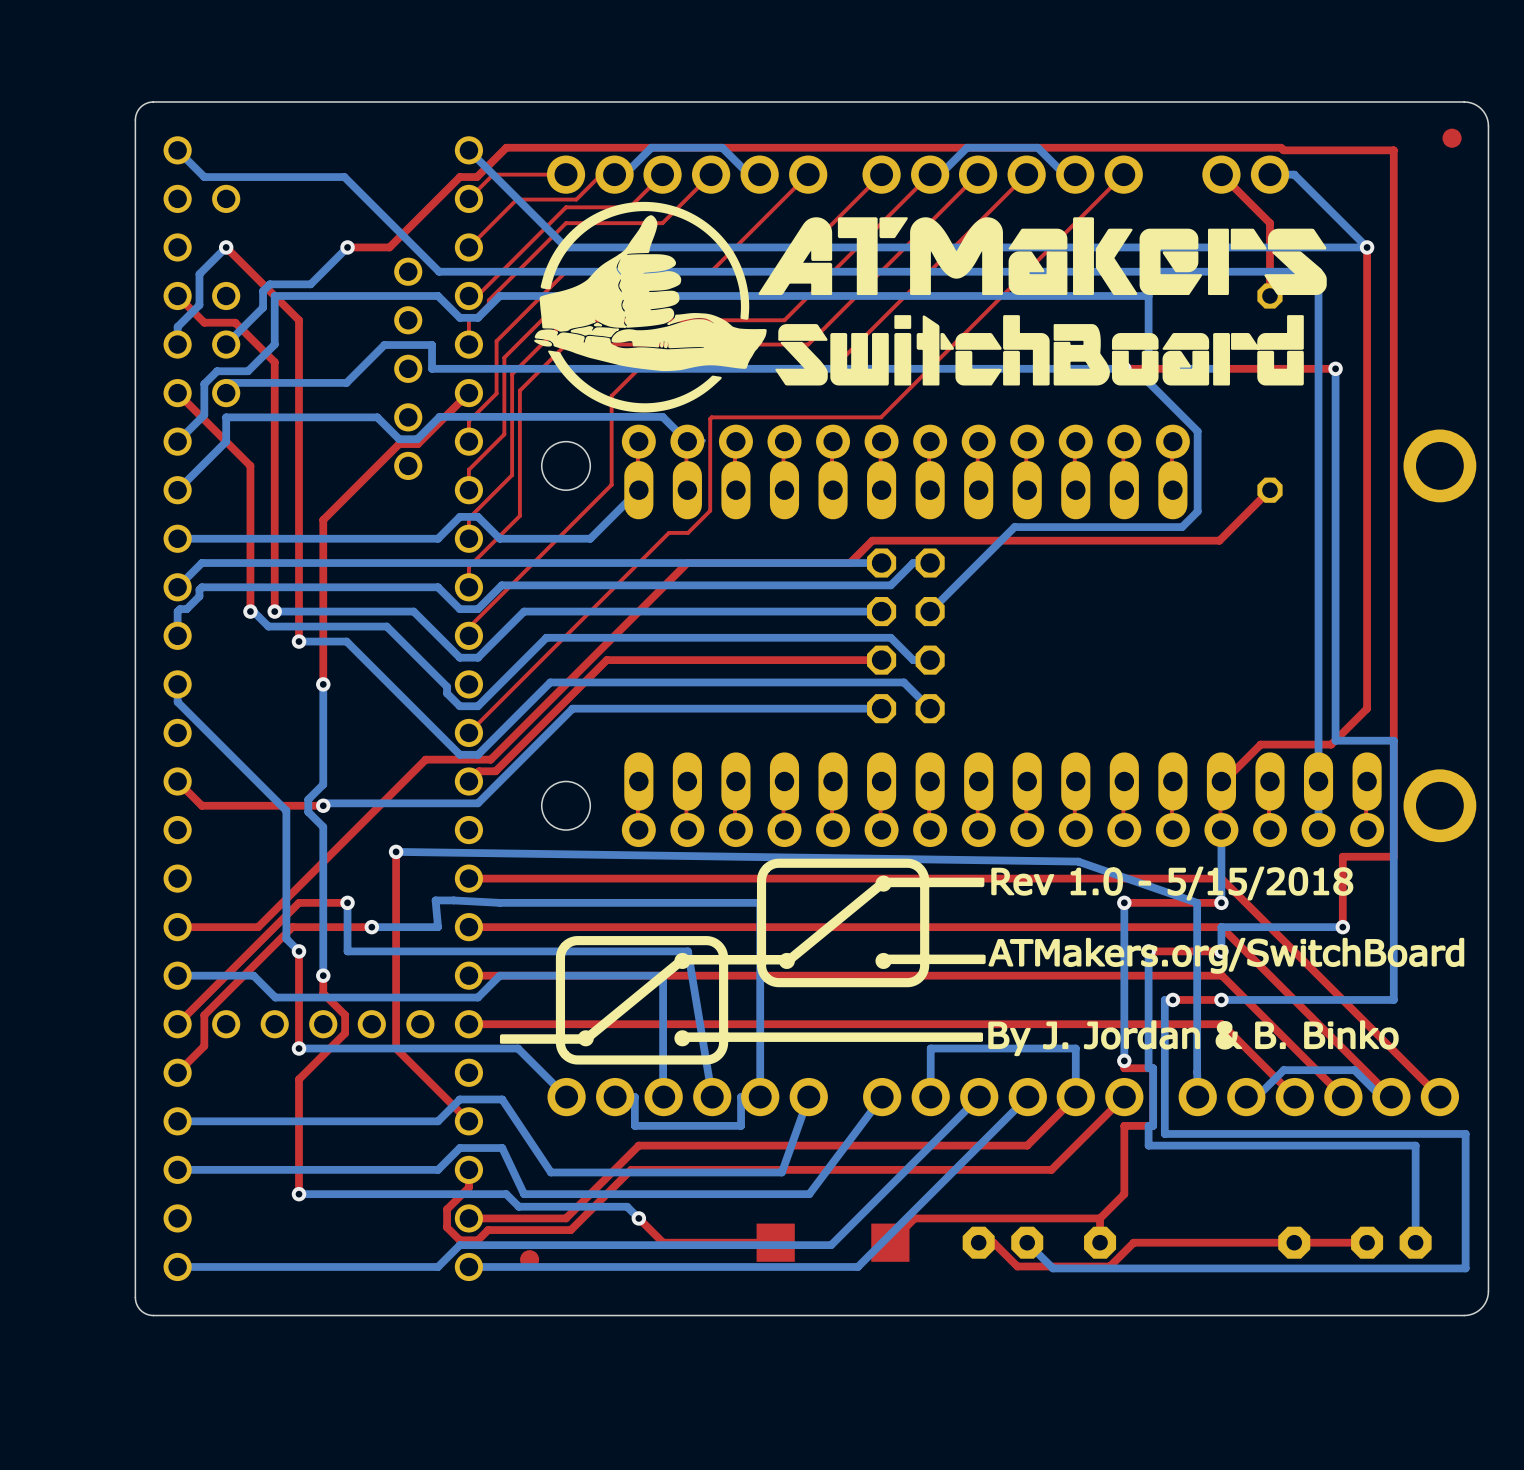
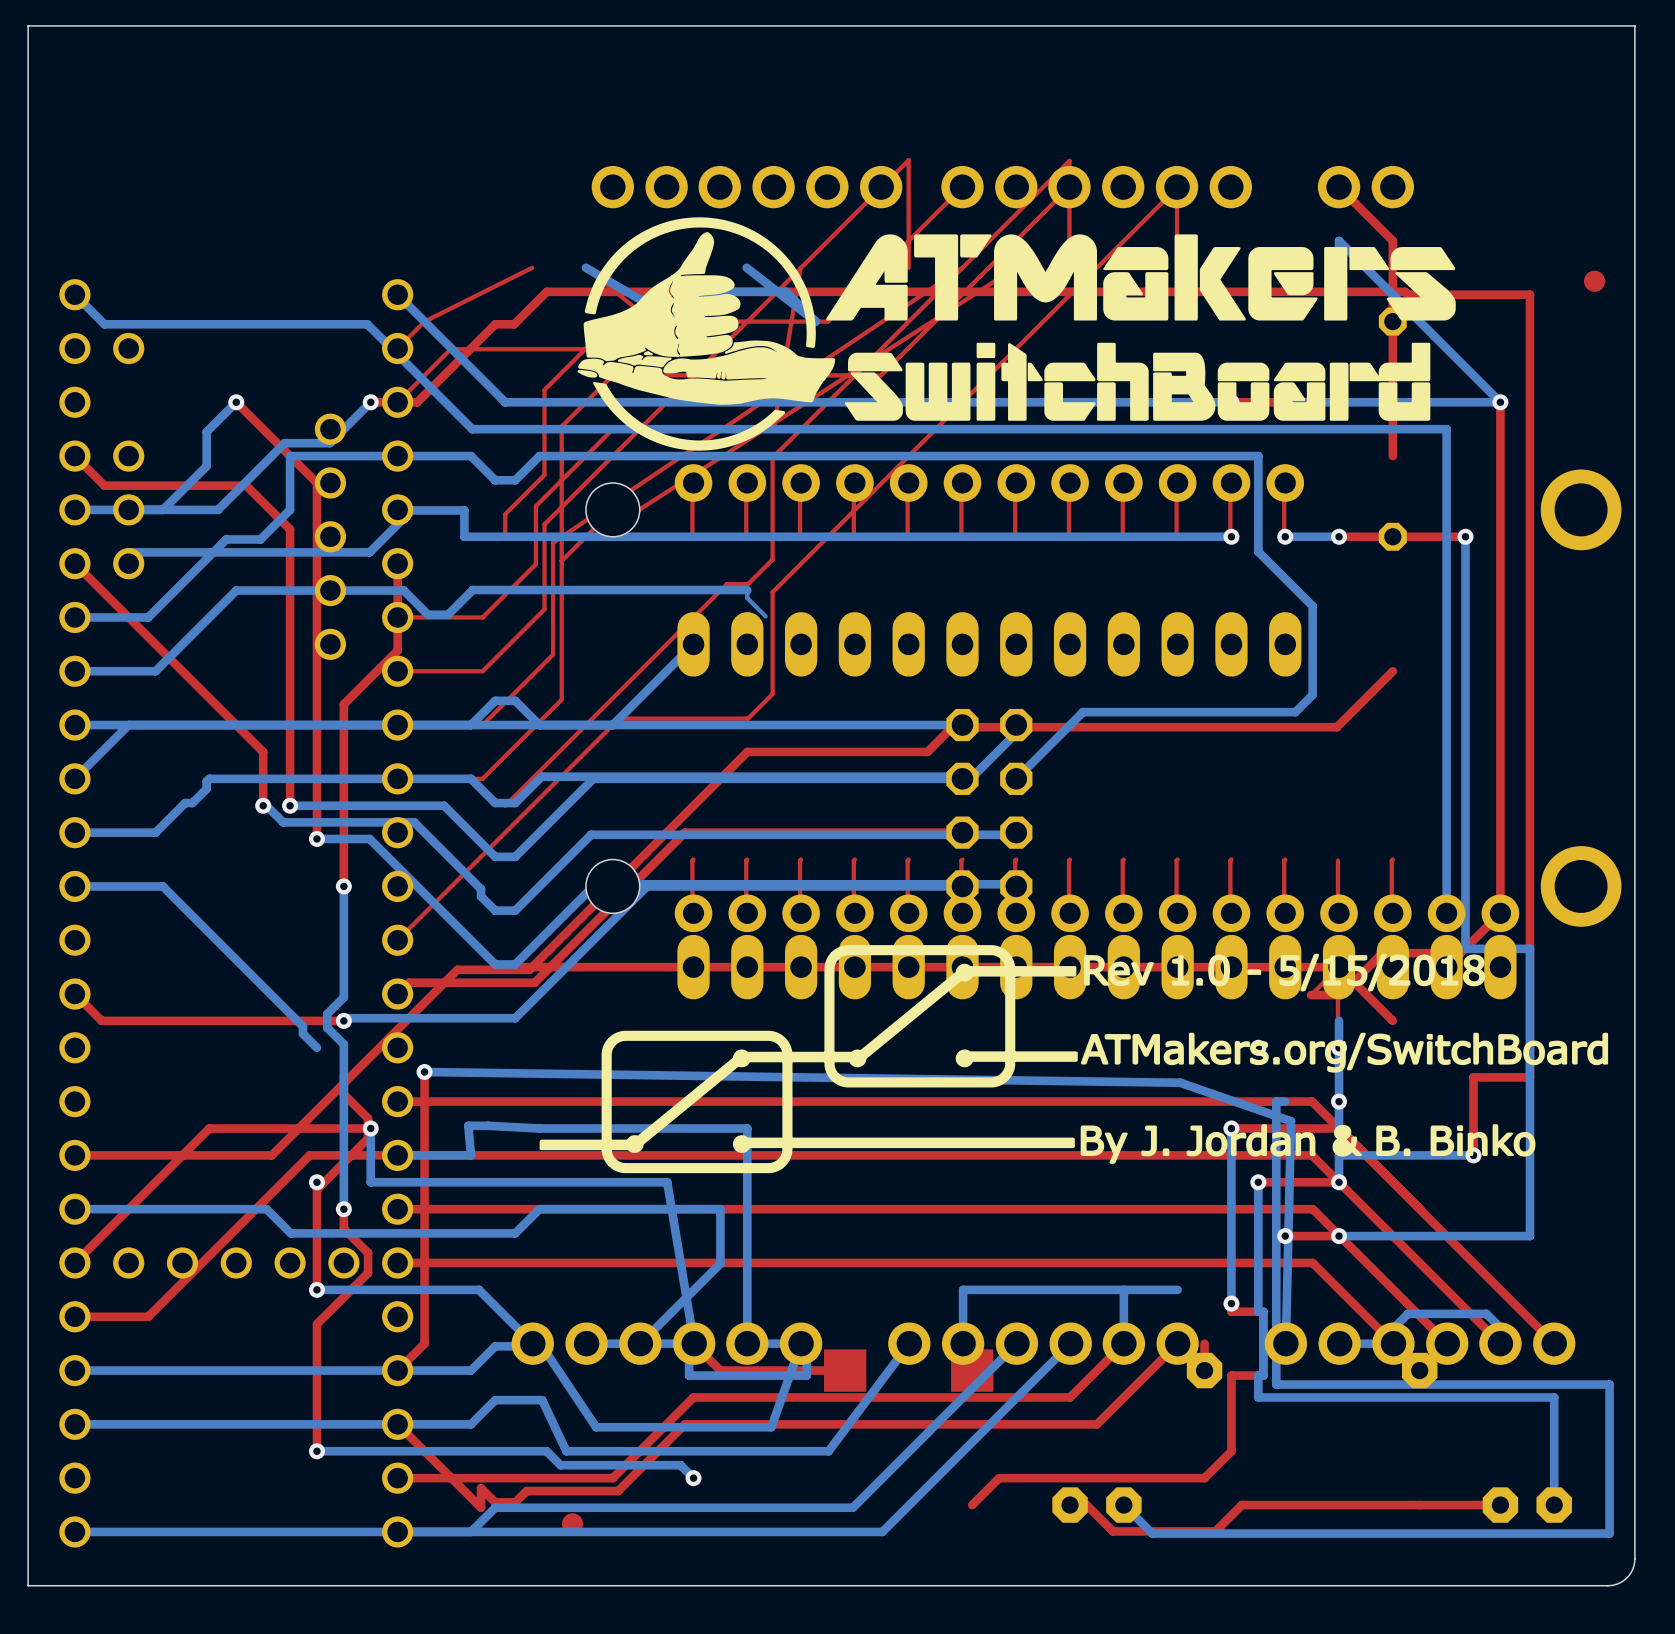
board edge: (1488, 126) (1486, 116) (1481, 109) (1473, 103) (1464, 101) (153, 101) (142, 105) (137, 110) (135, 119) (135, 1297) (140, 1310) (153, 1315) (1464, 1315) (1473, 1313) (1481, 1308) (1486, 1300) (1488, 1291) -> (1634, 133) (1634, 25) (28, 25) (28, 1585) (1611, 1585) (1627, 1577) (1634, 1562) (1634, 1424)
part position: (1452, 138) -> (1594, 281)
bottom track: (177, 150) (204, 177) (344, 177) (439, 271) (1318, 271) (1318, 393) -> (74, 294) (104, 324) (367, 324) (472, 429) (1446, 429)
bottom track: (468, 150) (566, 247) (1367, 247) (1294, 174) (1269, 174) -> none
top track: (566, 174) (493, 174) (468, 198) -> none
top track: (614, 174) (601, 174) (576, 199) (516, 199) (468, 247) -> none
top track: (662, 174) (629, 207) (566, 207) (477, 295) (468, 295) -> none
top track: (711, 174) (662, 223) (566, 223) (488, 300) (488, 304) (477, 315) (473, 315) (468, 320) (468, 344) -> none
bottom track: (759, 174) (749, 174) (722, 147) (651, 147) (624, 174) (614, 174) -> none
top track: (808, 174) (711, 271) (566, 271) (496, 341) (496, 393) (468, 421) (468, 441) -> none
top track: (930, 174) (784, 320) (566, 320) (512, 374) (512, 475) (468, 518) (468, 538) -> none
top track: (1026, 174) (832, 368) (638, 368) (611, 396) (611, 484) (468, 627) (468, 635) -> none
bottom track: (1075, 174) (1064, 174) (1037, 147) (966, 147) (940, 174) (930, 174) -> none
top track: (1123, 174) (881, 417) (711, 417) -> (1069, 267) (1069, 160) (774, 456)
bottom track: (226, 247) (199, 274) (199, 305) (177, 326) (177, 344) -> none
top track: (226, 247) (299, 320) (299, 441) -> (236, 402) (316, 482)
via: (226, 247) -> none
bottom track: (347, 247) (310, 284) (269, 284) (263, 291) (263, 307) (226, 344) -> none
top track: (347, 247) (389, 247) (459, 177) (477, 177) (506, 147) (1281, 147) (1283, 150) (1393, 150) (1393, 271) -> (370, 402) (417, 402) (495, 324) (514, 324) (546, 291) (1405, 291) (1408, 294) (1530, 294)
via: (347, 247) -> none
top track: none -> (532, 267) (424, 321) (397, 348)
top track: none -> (585, 267) (651, 321) (624, 349) (450, 349) (397, 402)
bottom track: none -> (746, 267) (815, 321) (785, 291) (707, 291) (677, 321) (585, 267)
top track: none -> (800, 267) (773, 429) (612, 429) (535, 506) (535, 564) (482, 617) (397, 617)
top track: none -> (908, 267) (908, 160) (544, 524) (544, 609) (482, 671) (397, 671)
top track: none -> (962, 267) (553, 542) (553, 654) (482, 725) (397, 725)
top track: none -> (1015, 267) (639, 509) (612, 509) (561, 560)
top track: none -> (1177, 267) (1177, 187) (772, 592) (772, 694) (748, 718) (619, 718) (397, 940)
bottom track: none -> (1339, 267) (1339, 240) (1500, 402) (1339, 402)
top track: (1367, 247) (1367, 368) -> (1392, 321) (1392, 456)
via: (1367, 247) -> none
top track: (177, 295) (204, 322) (235, 322) (274, 362) (274, 483) -> (74, 456) (104, 485) (246, 485) (290, 529)
bottom track: none -> (236, 402) (206, 431) (206, 466) (162, 509)
via: none -> (236, 402)
bottom track: none -> (370, 402) (329, 443) (284, 443) (218, 509) (74, 509)
via: none -> (370, 402)
bottom track: (468, 368) (432, 368) (432, 345) (384, 345) (346, 382) (226, 382) (226, 393) -> (505, 402) (397, 294)
bottom track: (1335, 368) (1335, 490) -> none
top track: (1335, 368) (1221, 368) -> (1465, 536) (1339, 536)
via position: (1335, 368) -> (1500, 402)
top track: (177, 393) (250, 465) (250, 611) -> none
top track: (468, 393) (417, 444) (399, 444) (323, 519) (323, 641) -> (397, 563) (397, 650) (343, 704)
bottom track: (274, 417) (226, 417) (226, 441) (177, 490) -> (290, 456) (290, 509) (260, 539) (226, 539) (148, 617) (74, 617)
bottom track: (377, 417) (399, 439) (417, 439) (439, 416) (662, 416) (687, 441) (703, 440) -> none
bottom track: (177, 441) (204, 414) (204, 384) (217, 371) (248, 371) (274, 344) (274, 295) (438, 295) (459, 317) (477, 317) (499, 295) (1148, 295) (1148, 382) (1197, 431) (1197, 511) (1182, 527) (1014, 527) (930, 611) -> none
bottom track: (638, 490) (590, 538) (499, 538) (477, 516) (459, 516) (438, 538) (377, 538) -> (765, 616) (747, 598) (746, 590) (472, 590) (448, 614) (427, 614) (403, 590)
part position: (905, 490) -> (989, 644)
bottom track: none -> (1231, 536) (464, 536) (464, 510) (411, 510) (369, 552) (128, 552) (128, 563)
via: none -> (1231, 536)
via: none -> (1285, 536)
bottom track: none -> (1339, 536) (1285, 536)
via: none -> (1339, 536)
top track: (1269, 490) (1219, 540) (872, 540) (850, 563) (687, 563) (490, 759) (425, 759) (258, 927) -> none
via: none -> (1465, 536)
top track: none -> (74, 563) (263, 751) (263, 805)
top track: (519, 515) (468, 566) (468, 587) -> (561, 565) (561, 699) (482, 778) (397, 778)
bottom track: (226, 538) (177, 538) -> (236, 590) (209, 617)
bottom track: (881, 563) (201, 563) -> none
bottom track: (930, 563) (913, 563) (890, 585) (501, 585) (477, 609) (459, 609) (438, 587) (201, 587) (199, 589) (199, 596) (186, 609) (180, 609) (177, 611) (177, 635) -> none
bottom track: none -> (182, 644) (155, 671) (74, 671)
bottom track: none -> (693, 644) (612, 725)
bottom track: (250, 611) (253, 611) (268, 626) (386, 626) (447, 686) (447, 693) (459, 706) (477, 706) (546, 637) (890, 637) (913, 660) (930, 660) -> (74, 832) (155, 832) (185, 803) (192, 803) (206, 788) (206, 781) (209, 778) (471, 778) (495, 803) (515, 803) (541, 776) (972, 776) (1016, 733) (1016, 725)
via: (250, 611) -> none
top track: none -> (290, 671) (290, 805)
via: (274, 611) -> none
bottom track: (881, 611) (524, 611) (477, 657) (459, 657) (413, 611) (274, 611) -> none
top track: none -> (1392, 671) (1336, 727) (952, 727) (927, 751) (747, 751) (529, 969) (457, 969) (271, 1155) (74, 1155)
part position: (905, 635) -> (989, 805)
bottom track: (299, 641) (346, 641) (459, 754) (477, 754) (550, 682) (903, 682) (930, 708) -> (403, 456) (471, 456) (495, 480) (515, 480) (539, 456) (1258, 456) (1258, 551) (1312, 606) (1312, 694) (1295, 712) (1082, 712) (1016, 778)
via: (299, 641) -> none
bottom track: none -> (128, 725) (74, 778)
bottom track: none -> (539, 725) (515, 700) (495, 700) (471, 725)
bottom track: none -> (962, 725) (74, 725)
top track: (881, 660) (606, 660) (495, 771) (479, 771) (468, 781) -> none
bottom track: (177, 684) (177, 702) (286, 810) (286, 932) -> (74, 886) (162, 886) (302, 1026)
bottom track: (323, 684) (323, 784) (308, 799) (308, 811) (323, 826) -> (343, 886) (343, 909)
via: (323, 684) -> none
part position: (323, 708) -> (236, 913)
bottom track: (572, 708) (477, 803) (325, 803) (323, 805) -> (620, 778) (593, 778) (515, 856) (495, 856) (444, 805) (290, 805)
top track: (1367, 708) (1331, 744) (1260, 744) (1222, 782) (1221, 781) -> (1500, 778) (1500, 913) (1460, 953) (1382, 953) (1340, 995) (1311, 995) (1339, 967)
bottom track: none -> (263, 805) (266, 805) (283, 822) (414, 822) (481, 889) (481, 896) (495, 910) (515, 910) (591, 834) (1014, 834) (1016, 832)
via: none -> (263, 805)
via: none -> (290, 805)
bottom track: (1335, 740) (1393, 740) (1393, 862) -> (1465, 814) (1465, 948) (1530, 948)
top track: none -> (962, 832) (684, 832) (534, 982) (408, 982) (397, 994)
bottom track: none -> (316, 838) (369, 838) (495, 964) (515, 964) (595, 884) (1014, 884) (1016, 886)
via: none -> (316, 838)
top track: (177, 781) (201, 805) (323, 805) -> (343, 751) (343, 886)
part position: (1002, 781) -> (1096, 967)
bottom track: none -> (962, 886) (647, 886) (515, 1018) (346, 1018) (343, 1020)
bottom track: (1221, 830) (1221, 902) -> (1339, 1047) (1339, 1128)
bottom track: (396, 851) (1078, 861) (1197, 902) (1197, 1097) -> none
top track: (396, 851) (396, 973) -> (316, 704) (316, 838)
via: (396, 851) -> none
top track: (1393, 856) (1342, 856) (1342, 927) -> (1530, 942) (1530, 1077) (1473, 1077) (1473, 1155)
top track: none -> (74, 994) (101, 1020) (182, 1020)
bottom track: (347, 902) (347, 951) (687, 951) (712, 1097) -> none
top track: (347, 902) (299, 902) (177, 1024) -> none
via: (347, 902) -> none
bottom track: (1124, 902) (1124, 1024) -> (1231, 1169) (1231, 1303)
via: (1124, 902) -> none
top track: (1221, 902) (1124, 902) -> none
via: (1221, 902) -> none
top track: none -> (1337, 995) (1339, 1020)
bottom track: (323, 905) (323, 948) -> (343, 997) (327, 1014) (327, 1027) (343, 1044)
top track: (292, 927) (204, 1015) (204, 1046) (177, 1072) -> (309, 1020) (271, 1020)
via: none -> (343, 1020)
bottom track: (371, 927) (438, 927) (435, 900) (499, 902) (760, 902) (760, 1097) (741, 1097) (741, 1125) (634, 1125) (634, 1097) -> (640, 1343) (720, 1263) (720, 1209) (689, 1209)
top track: (371, 927) (323, 927) -> none
via: (371, 927) -> none
top track: (468, 927) (1221, 927) (1391, 1097) -> none
top track: (1269, 927) (1439, 1097) -> none
bottom track: (1342, 927) (1221, 927) -> none
via: (1342, 927) -> none
top track: (299, 951) (299, 1048) -> none
via: (299, 951) -> none
bottom track: (1148, 951) (1148, 1068) (1153, 1068) (1153, 1125) (1148, 1125) -> (1258, 1182) (1258, 1241)
top track: (1221, 951) (1148, 951) -> (1339, 1182) (1258, 1182)
bottom track: none -> (424, 1072) (1180, 1082) (1291, 1121) (1285, 1343)
via: none -> (424, 1072)
bottom track: (177, 975) (253, 975) (275, 997) (477, 997) (499, 975) (663, 975) (663, 1097) -> none
bottom track: none -> (343, 1074) (343, 1209)
via: (323, 975) -> none
top track: (468, 975) (1222, 975) (1343, 1097) -> none
top track: none -> (1285, 1101) (397, 1101)
via: (1172, 999) -> none
top track: (1221, 999) (1197, 999) -> (1554, 1343) (1312, 1101)
bottom track: (1393, 999) (1221, 999) -> (1530, 1101) (1530, 1236) (1339, 1236)
top track: none -> (370, 1128) (209, 1128) (74, 1262)
via: none -> (370, 1128)
top track: (1124, 1024) (468, 1024) -> none
via: none -> (1231, 1128)
via position: (299, 1048) -> (316, 1182)
bottom track: (371, 1048) (299, 1048) -> none
top track: (396, 1048) (468, 1121) -> (424, 1155) (424, 1343) (397, 1370)
bottom track: (438, 1048) (518, 1048) (566, 1097) -> (471, 1155) (468, 1125) (539, 1128) (747, 1128) (747, 1343) (806, 1343) (806, 1375) (689, 1375) (689, 1343) (586, 1343)
bottom track: none -> (1473, 1155) (1339, 1155) (1339, 1182)
via: none -> (1473, 1155)
top track: (1124, 1060) (1124, 1068) (1153, 1068) (1153, 1125) (1124, 1125) (1124, 1182) -> none
via: (1124, 1060) -> none
via: none -> (1258, 1182)
via: none -> (1339, 1182)
top track: none -> (343, 1209) (343, 1228) (368, 1252) (368, 1273) (316, 1324) (316, 1451)
via: none -> (343, 1209)
top track: none -> (397, 1209) (1312, 1209) (1447, 1343)
bottom track: none -> (667, 1209) (539, 1209) (515, 1233) (290, 1233) (266, 1209) (74, 1209)
part position: (687, 1097) -> (666, 1343)
bottom track: (808, 1097) (781, 1172) (550, 1172) (502, 1099) (459, 1099) (438, 1121) (177, 1121) -> none
bottom track: (882, 1097) (809, 1194) (524, 1194) (502, 1148) (459, 1148) (438, 1169) -> (532, 1343) (478, 1289) (471, 1289)
bottom track: (979, 1097) (831, 1245) (459, 1245) (438, 1266) (177, 1266) -> none
part position: (1003, 1097) -> (1043, 1343)
bottom track: (1027, 1097) (857, 1266) (468, 1266) -> none
bottom track: (1075, 1097) (1075, 1048) (930, 1048) (930, 1097) -> none
top track: (1075, 1097) (1027, 1145) -> (1393, 1343) (1312, 1262) (1123, 1262)
top track: (1124, 1097) (1051, 1169) (631, 1169) (570, 1230) (488, 1230) (477, 1240) (459, 1240) (447, 1227) (447, 1209) (468, 1187) (468, 1169) -> none
part position: (1318, 1097) -> (1420, 1343)
bottom track: (1391, 1097) (1381, 1097) (1354, 1070) (1283, 1070) (1256, 1097) (1246, 1097) -> none
via: none -> (1285, 1236)
top track: none -> (1339, 1236) (1285, 1236)
via: none -> (1339, 1236)
bottom track: (1164, 1133) (1465, 1133) (1465, 1255) -> (1276, 1250) (1276, 1384) (1609, 1384)
top track: (638, 1145) (566, 1218) (468, 1218) -> (693, 1262) (397, 1262)
bottom track: (1148, 1145) (1415, 1145) (1415, 1242) -> (1258, 1262) (1258, 1311) (1263, 1311) (1263, 1375) (1258, 1375) (1258, 1397) (1554, 1397) (1554, 1505)
bottom track: (299, 1169) (177, 1169) -> none
top track: (299, 1169) (299, 1194) -> none
bottom track: none -> (1123, 1289) (1123, 1343)
bottom track: none -> (1177, 1289) (963, 1289) (963, 1343)
via: none -> (1231, 1303)
top track: (1124, 1189) (1124, 1194) (1100, 1218) (914, 1218) (890, 1242) -> (1231, 1311) (1263, 1311) (1263, 1375) (1231, 1375) (1231, 1451) (1204, 1478) (999, 1478) (972, 1505)
top track: none -> (74, 1316) (148, 1316) (309, 1155) (1312, 1155) (1500, 1343)
bottom track: (299, 1194) (506, 1194) (518, 1206) (627, 1206) (638, 1218) -> (370, 1128) (370, 1182) (667, 1182) (694, 1343)
via position: (299, 1194) -> (316, 1289)
via: (638, 1218) -> none
bottom track: none -> (801, 1343) (771, 1427) (596, 1427) (542, 1346) (495, 1346) (471, 1370) (74, 1370)
bottom track: none -> (909, 1343) (828, 1451) (566, 1451) (542, 1400) (495, 1400) (471, 1424) (74, 1424)
bottom track: none -> (1016, 1343) (852, 1507) (495, 1507) (471, 1531)
bottom track: none -> (1070, 1343) (882, 1531) (74, 1531)
top track: none -> (1123, 1343) (1070, 1397) (693, 1397) (612, 1478) (397, 1478)
top track: none -> (1177, 1343) (1096, 1424) (684, 1424) (618, 1491) (526, 1491) (515, 1502) (495, 1502) (481, 1488) (481, 1507) (397, 1424)
bottom track: none -> (1500, 1343) (1500, 1327) (1486, 1313) (1408, 1313) (1378, 1343) (1339, 1343)
part position: (1002, 1242) -> (1096, 1505)
bottom track: (1027, 1242) (1052, 1268) (1465, 1268) -> (1123, 1505) (1152, 1533) (1609, 1533) (1609, 1399)
top track: (1367, 1242) (1133, 1242) (1109, 1266) (1017, 1266) (993, 1242) (978, 1242) -> (1500, 1505) (1241, 1505) (1215, 1531) (1112, 1531) (1086, 1505) (1070, 1505)
part position: (1391, 1242) -> (1527, 1505)
part position: (529, 1259) -> (572, 1523)
bottom track: none -> (316, 1451) (546, 1451) (560, 1465) (680, 1465) (693, 1478)
via: none -> (316, 1451)
via: none -> (693, 1478)

